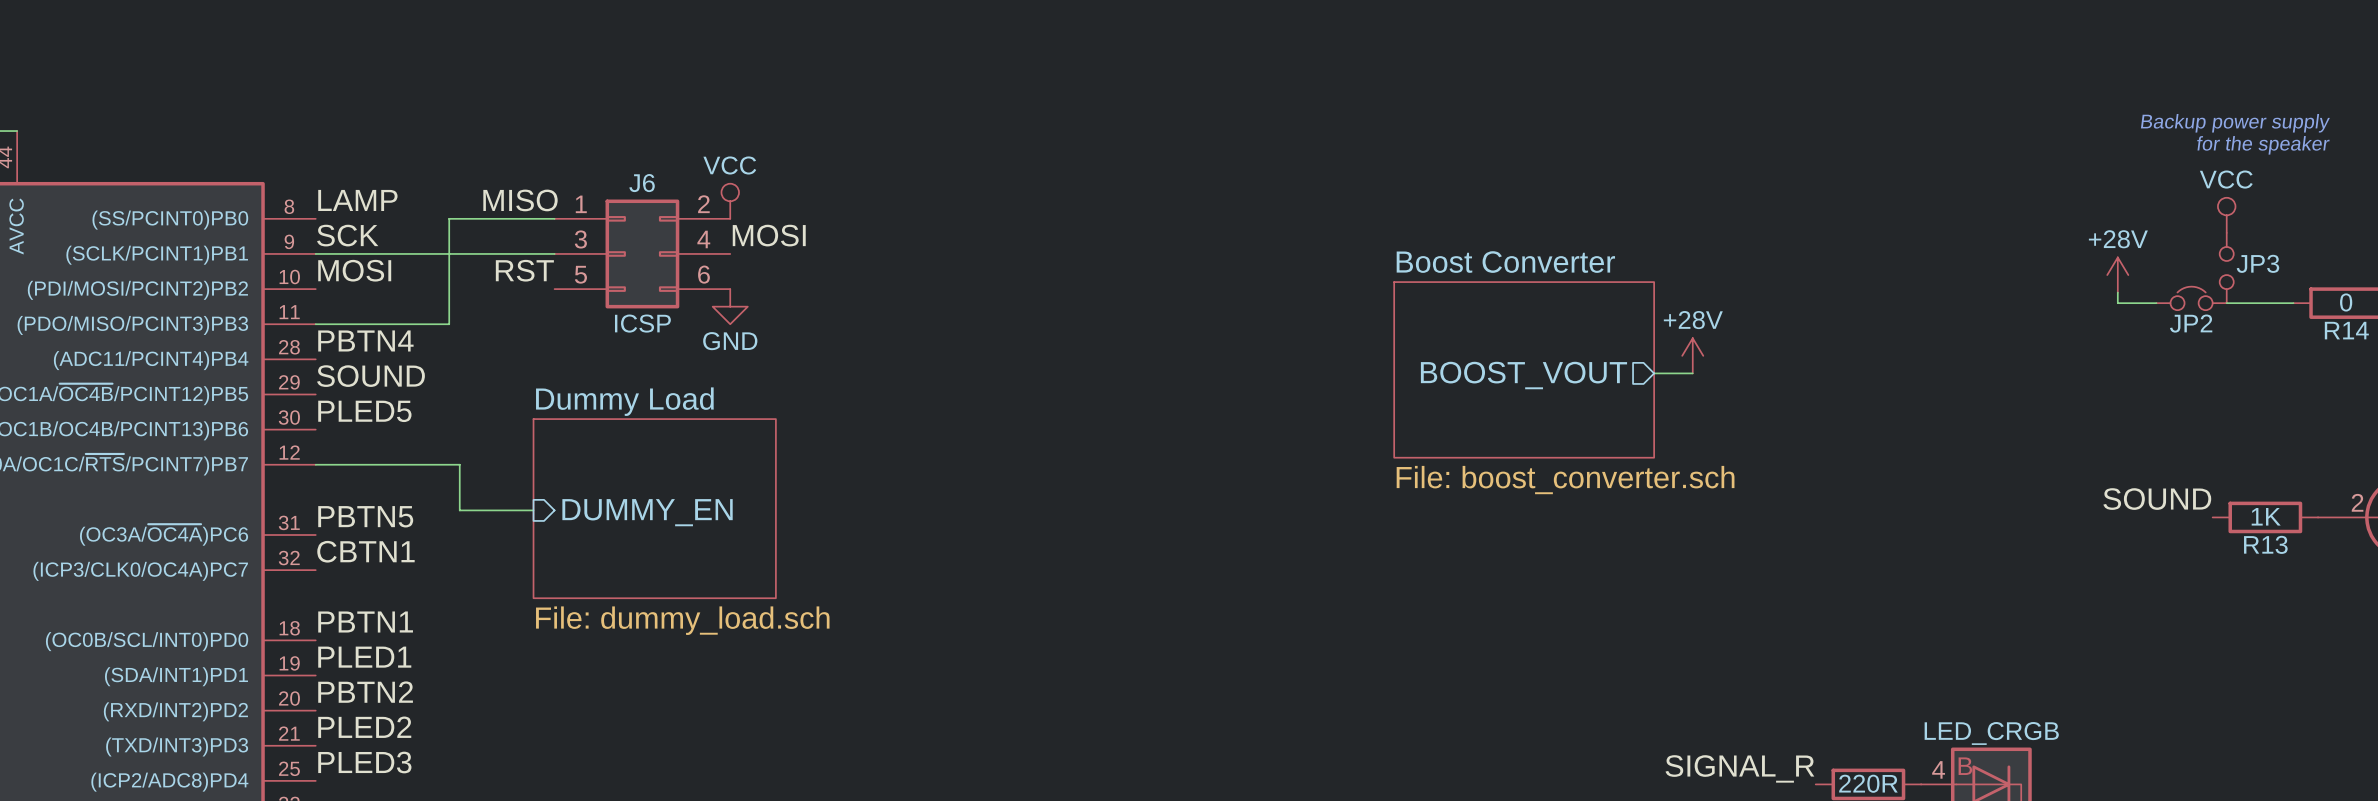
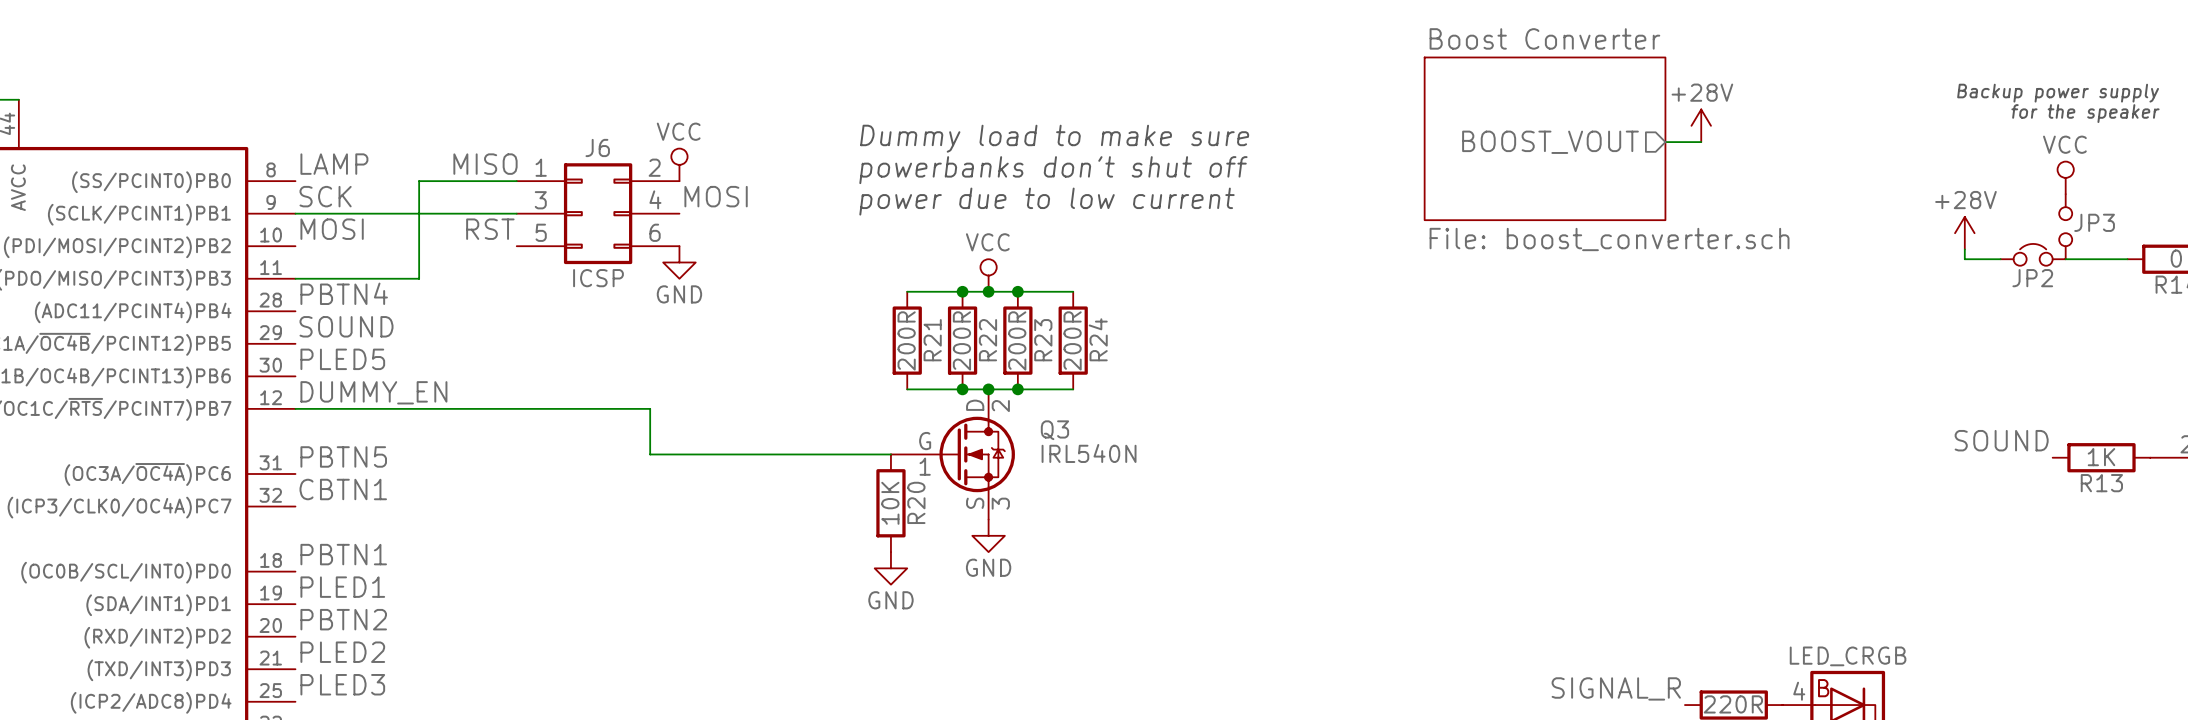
text: none -> Dummy load to make sure (1054, 138)
text: none -> powerbanks don't shut off (1053, 170)
text: none -> power due to low current (1046, 201)
power symbol: none -> VCC (988, 275)
wire: none -> (907, 291) (1073, 291)
junction: none -> (962, 291)
junction: none -> (988, 291)
junction: none -> (1017, 291)
power symbol position: +28V (1692, 355) -> +28V (1701, 125)
sheet Boost Converter position: (1524, 369) -> (1545, 138)
wire: (1654, 373) (1692, 373) -> (1665, 142) (1701, 142)
sheet pin position: BOOST_VOUT (1523, 375) -> BOOST_VOUT (1550, 142)
R21: none -> 200R (907, 340)
R22: none -> 200R (962, 340)
R23: none -> 200R (1017, 340)
R24: none -> 200R (1073, 340)
wire: none -> (907, 389) (1073, 389)
junction: none -> (962, 389)
junction: none -> (988, 389)
junction: none -> (1017, 389)
label: none -> DUMMY_EN (373, 392)
wire: (459, 464) (459, 510) (533, 510) -> (428, 408) (650, 408) (650, 454) (890, 454)
sheet Dummy Load: File: dummy_load.sch (654, 508) -> none
sheet pin: DUMMY_EN (647, 512) -> none
Q3: none -> IRL540N (952, 454)
R20: none -> 10K (890, 503)
power symbol: none -> GND (988, 535)
power symbol: none -> GND (890, 568)

